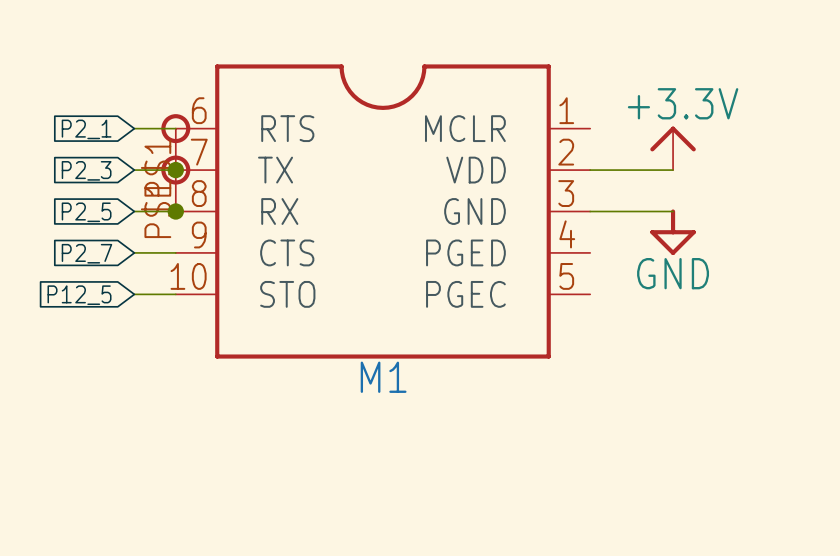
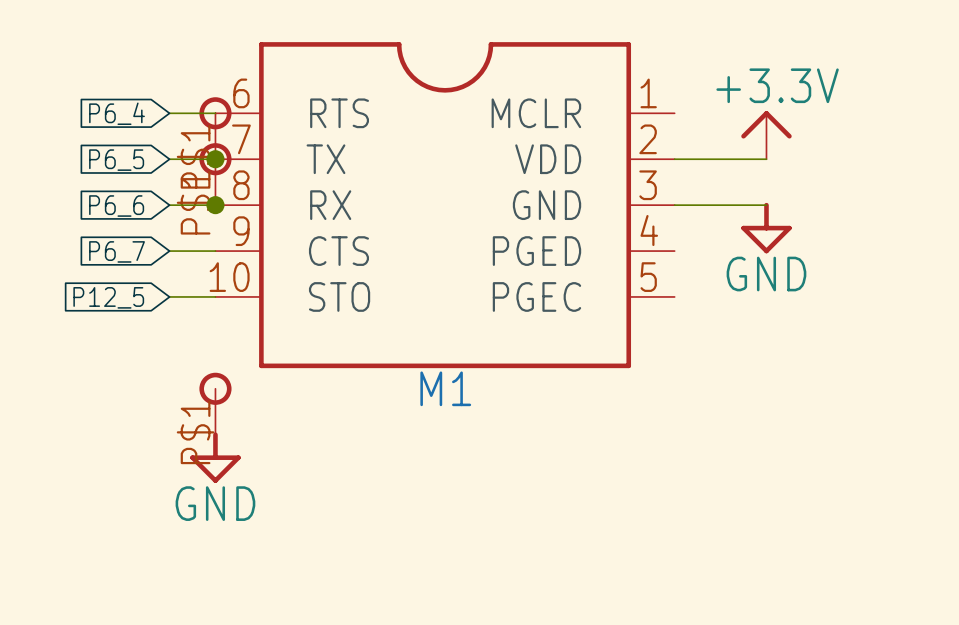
global label: P2_1 (86, 129) -> P6_4 (117, 113)
global label: P2_3 (86, 170) -> P6_5 (116, 160)
global label: P2_5 (86, 212) -> P6_6 (116, 206)
global label: P2_7 (86, 253) -> P6_7 (117, 251)
part: none -> (215, 403)
power symbol: none -> GND (215, 457)

